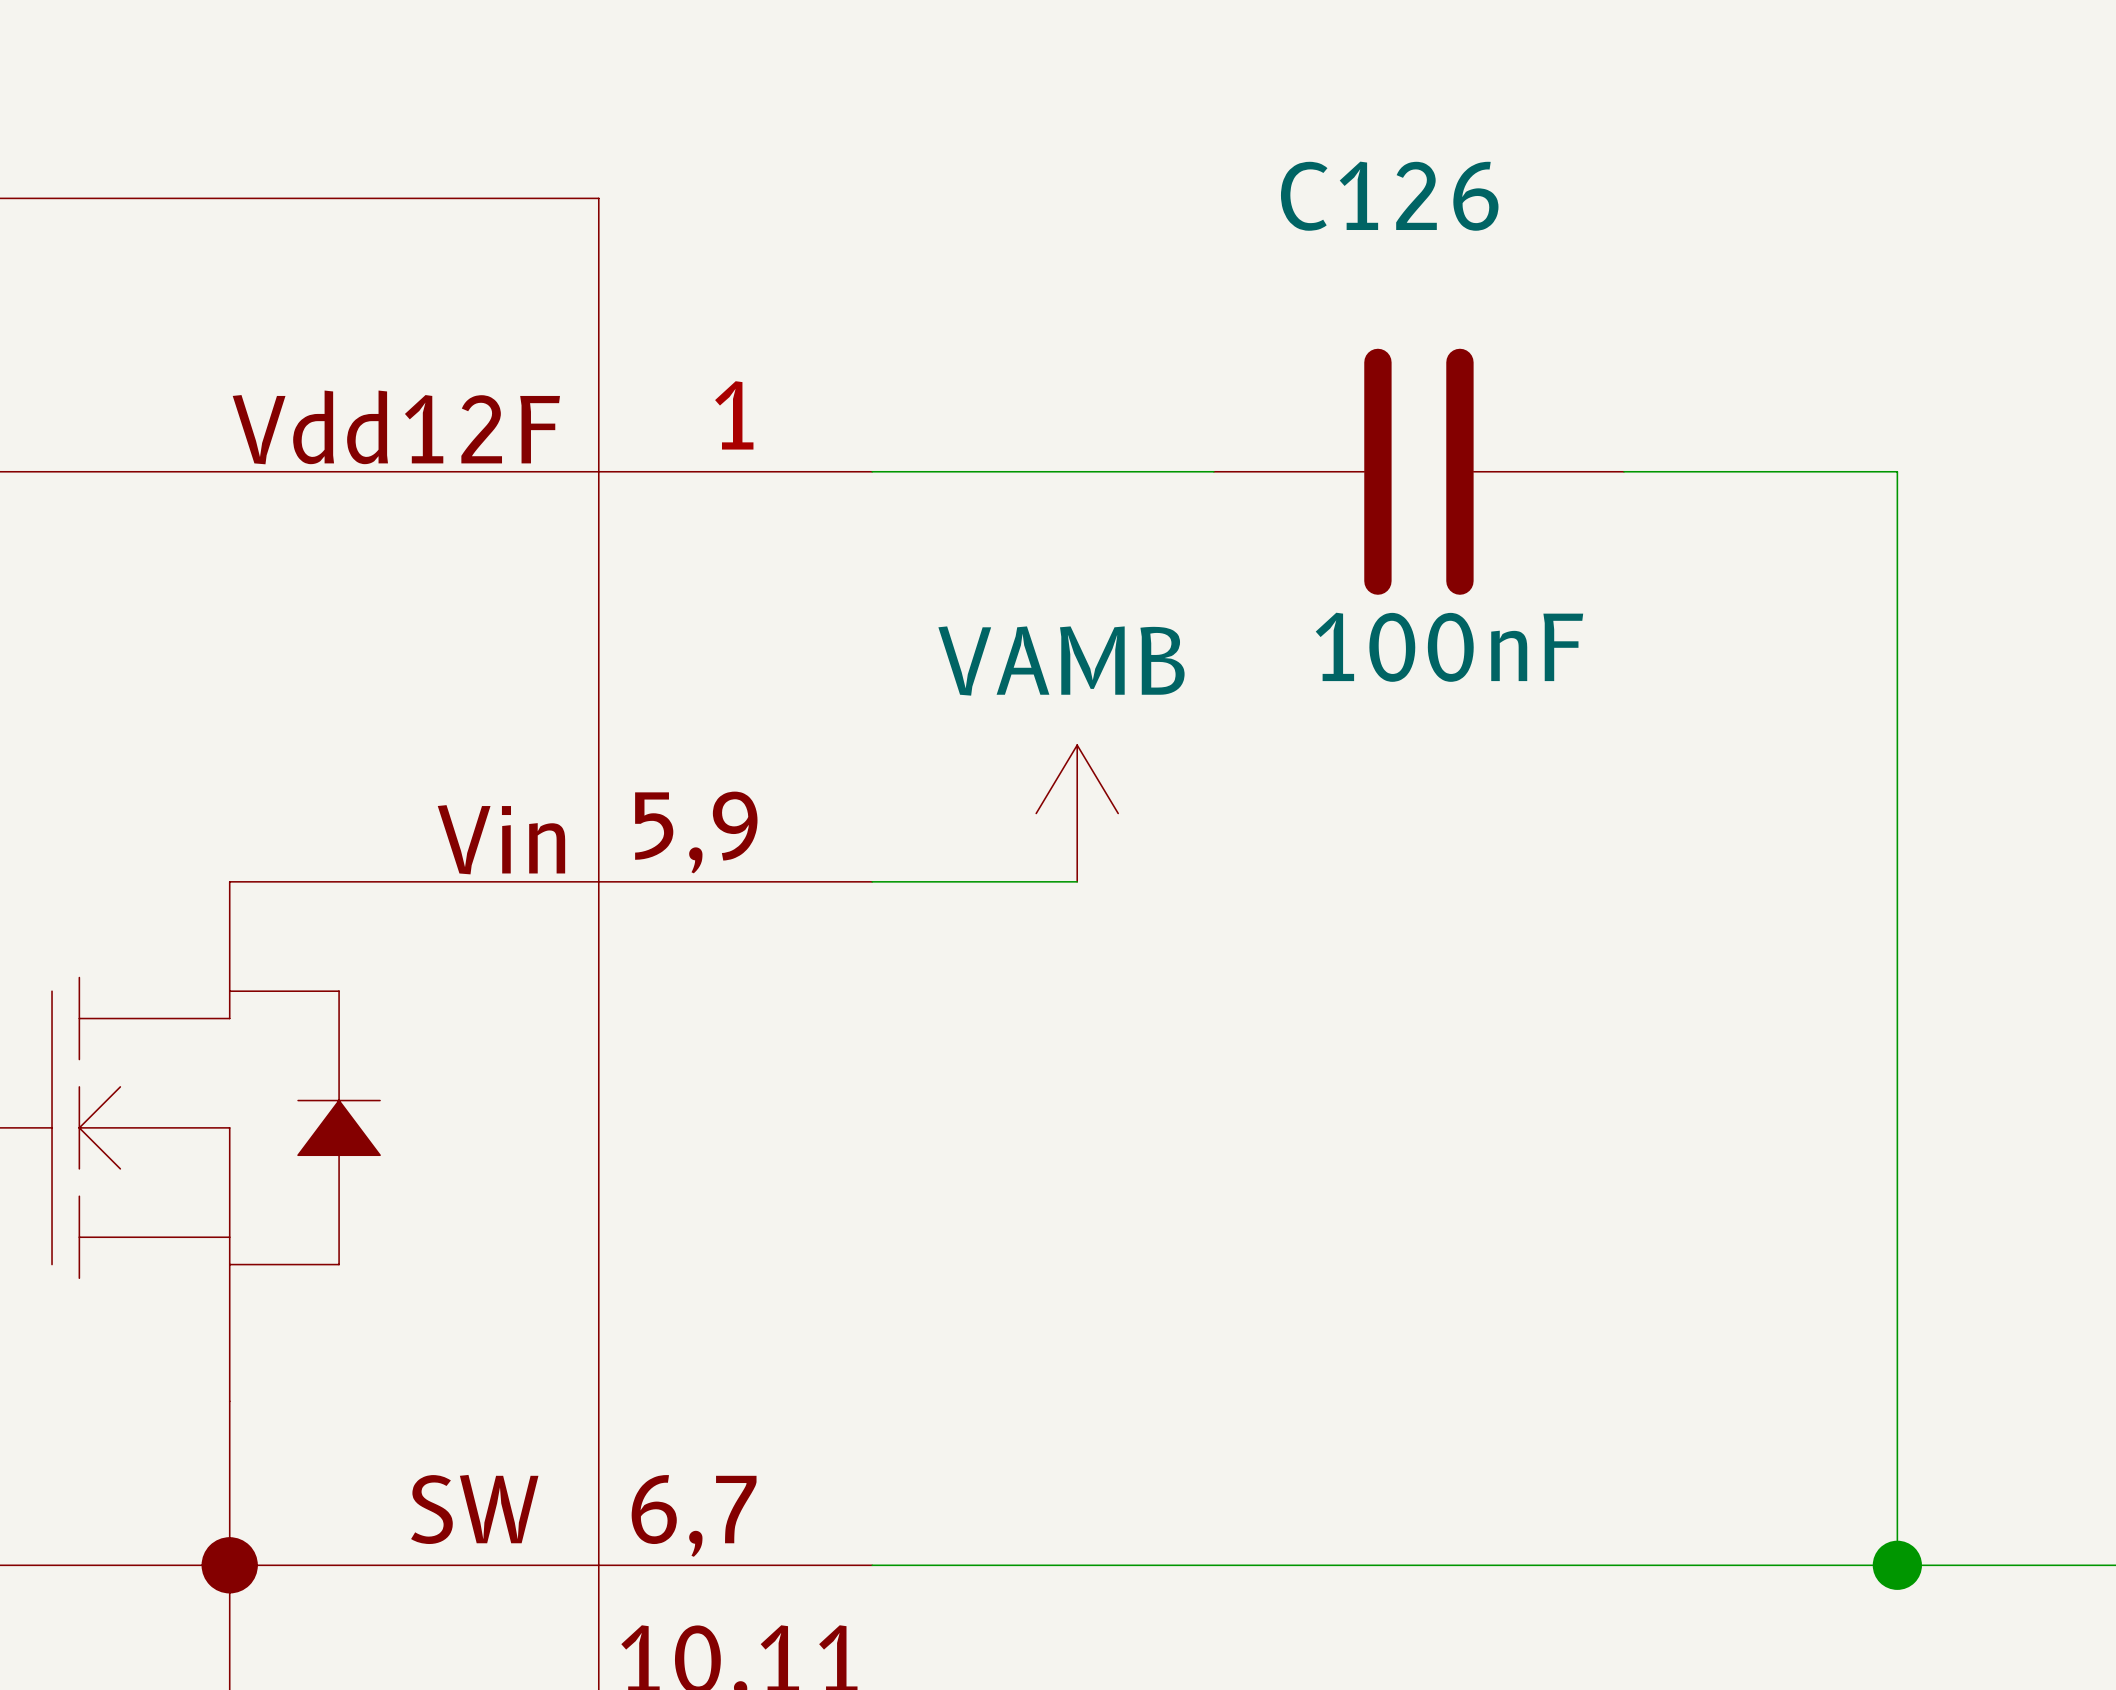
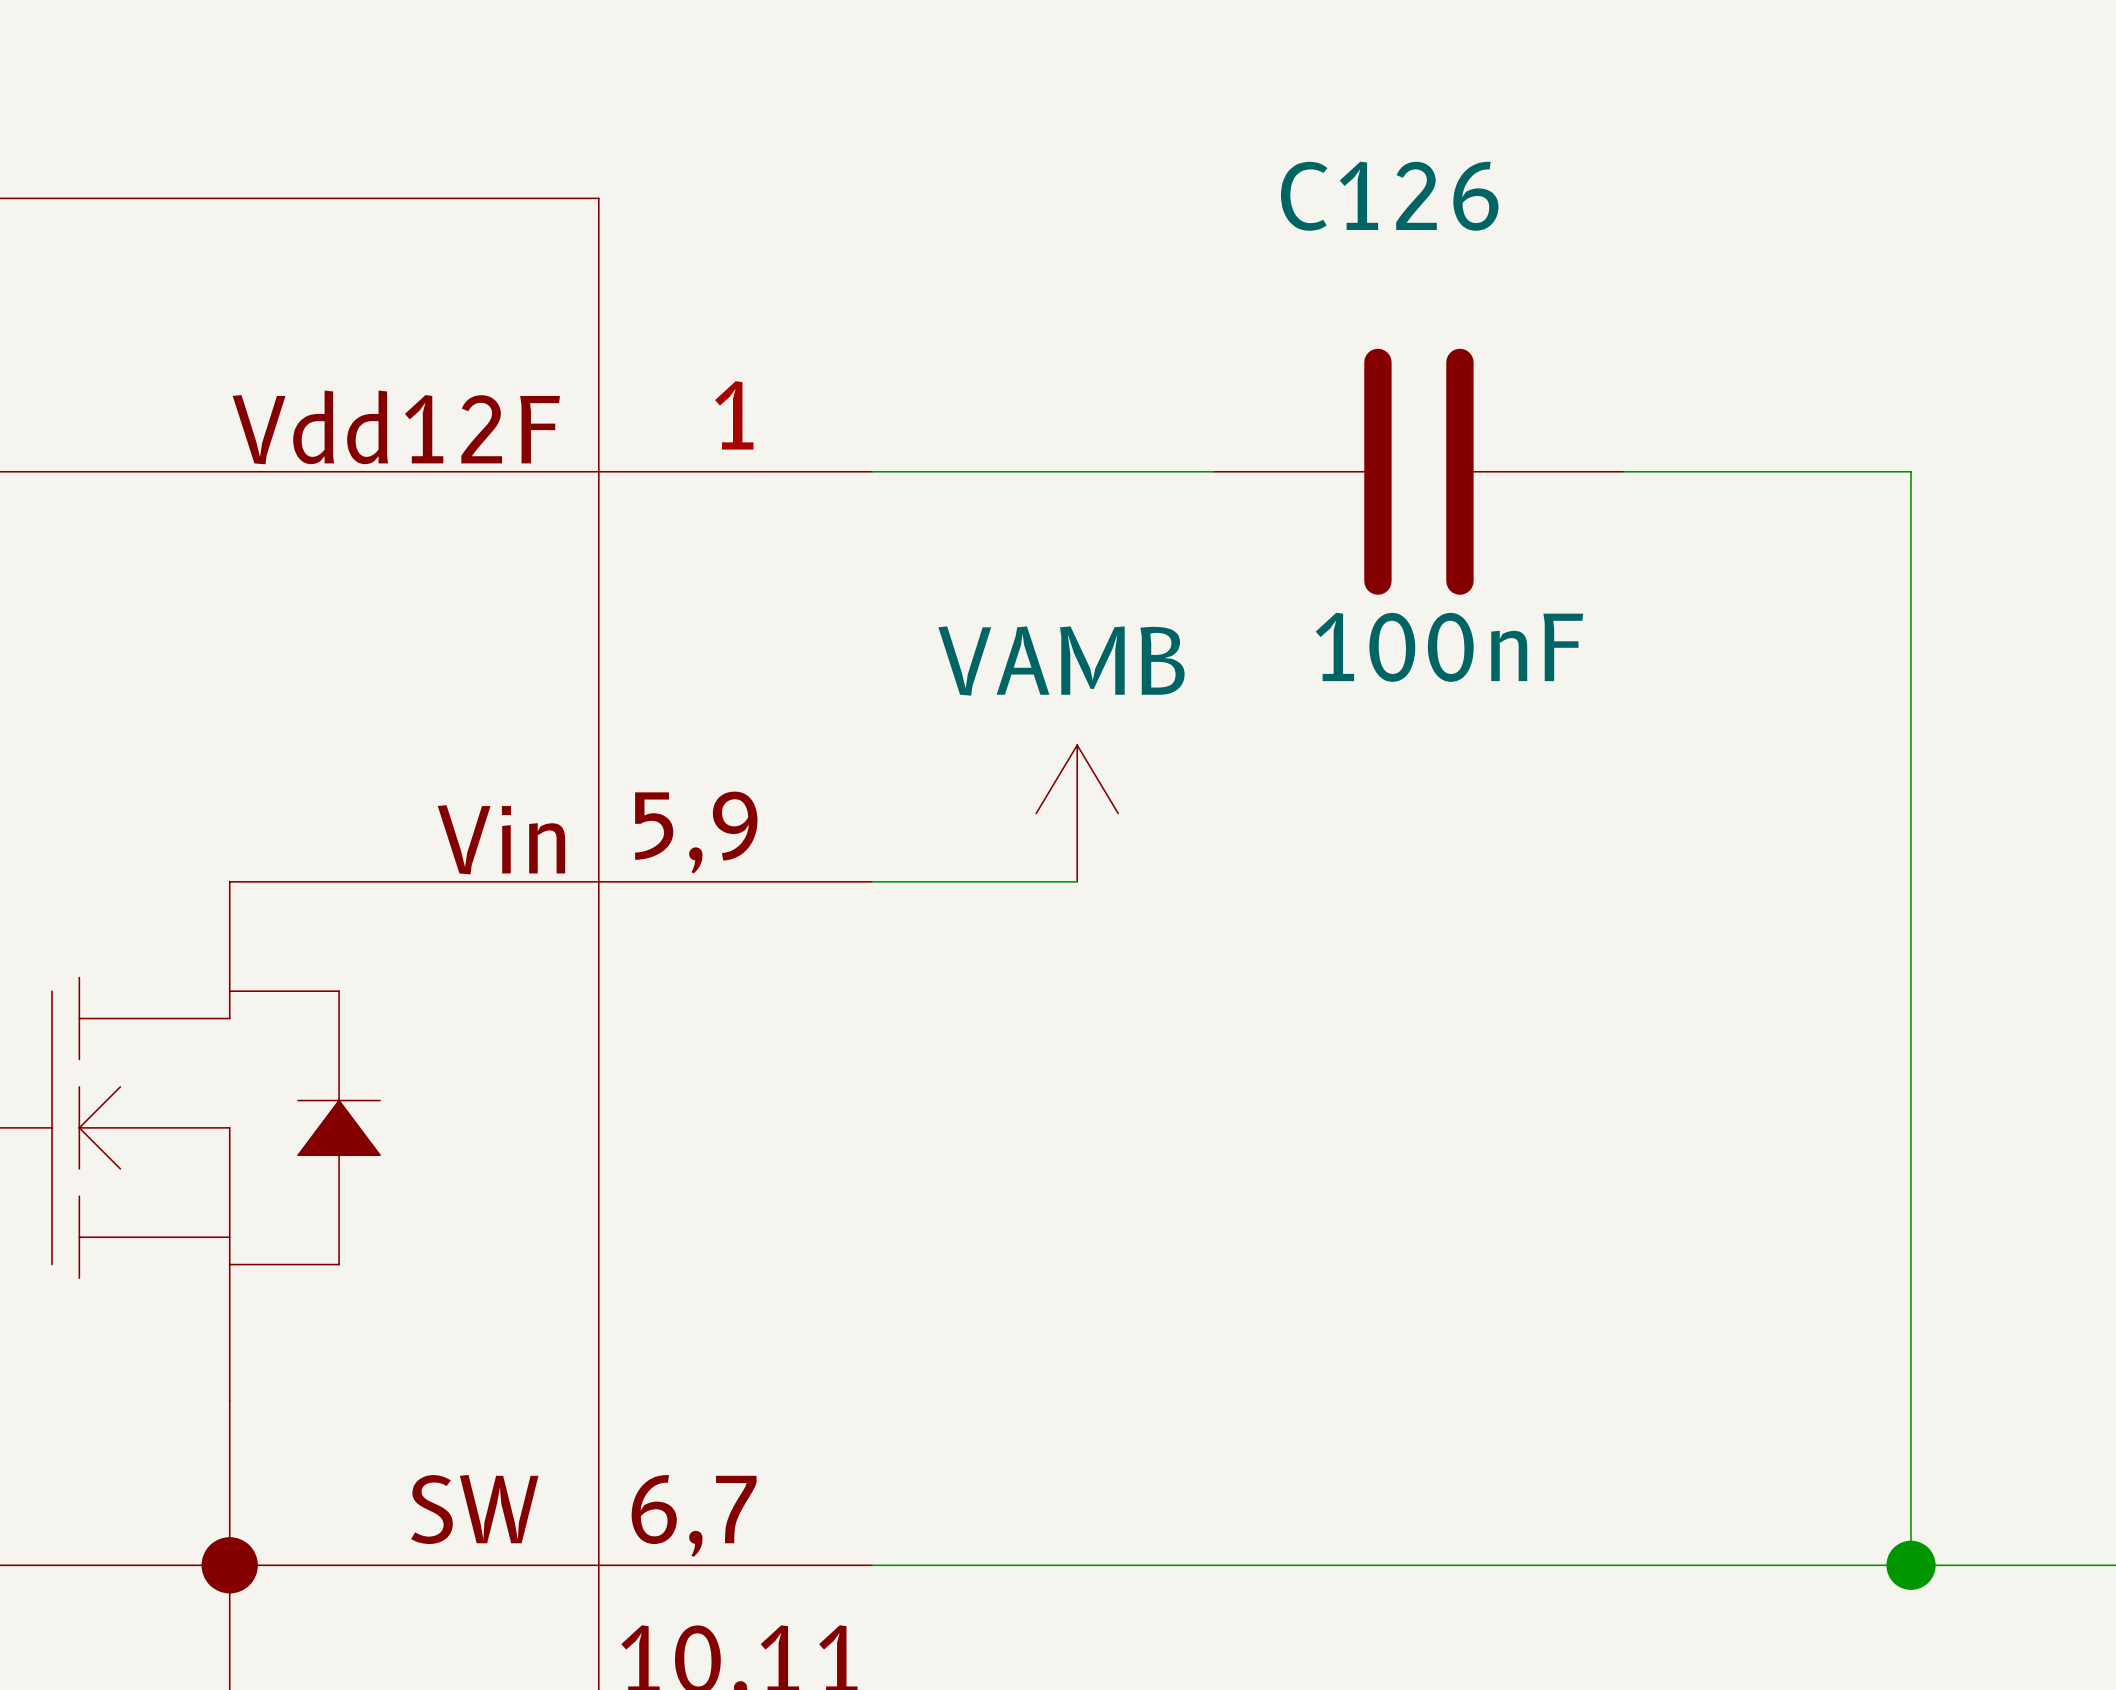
wire: (1897, 471) (1897, 1565) -> (1897, 471) (1911, 471) (1911, 1565)
junction position: (1897, 1565) -> (1911, 1565)

